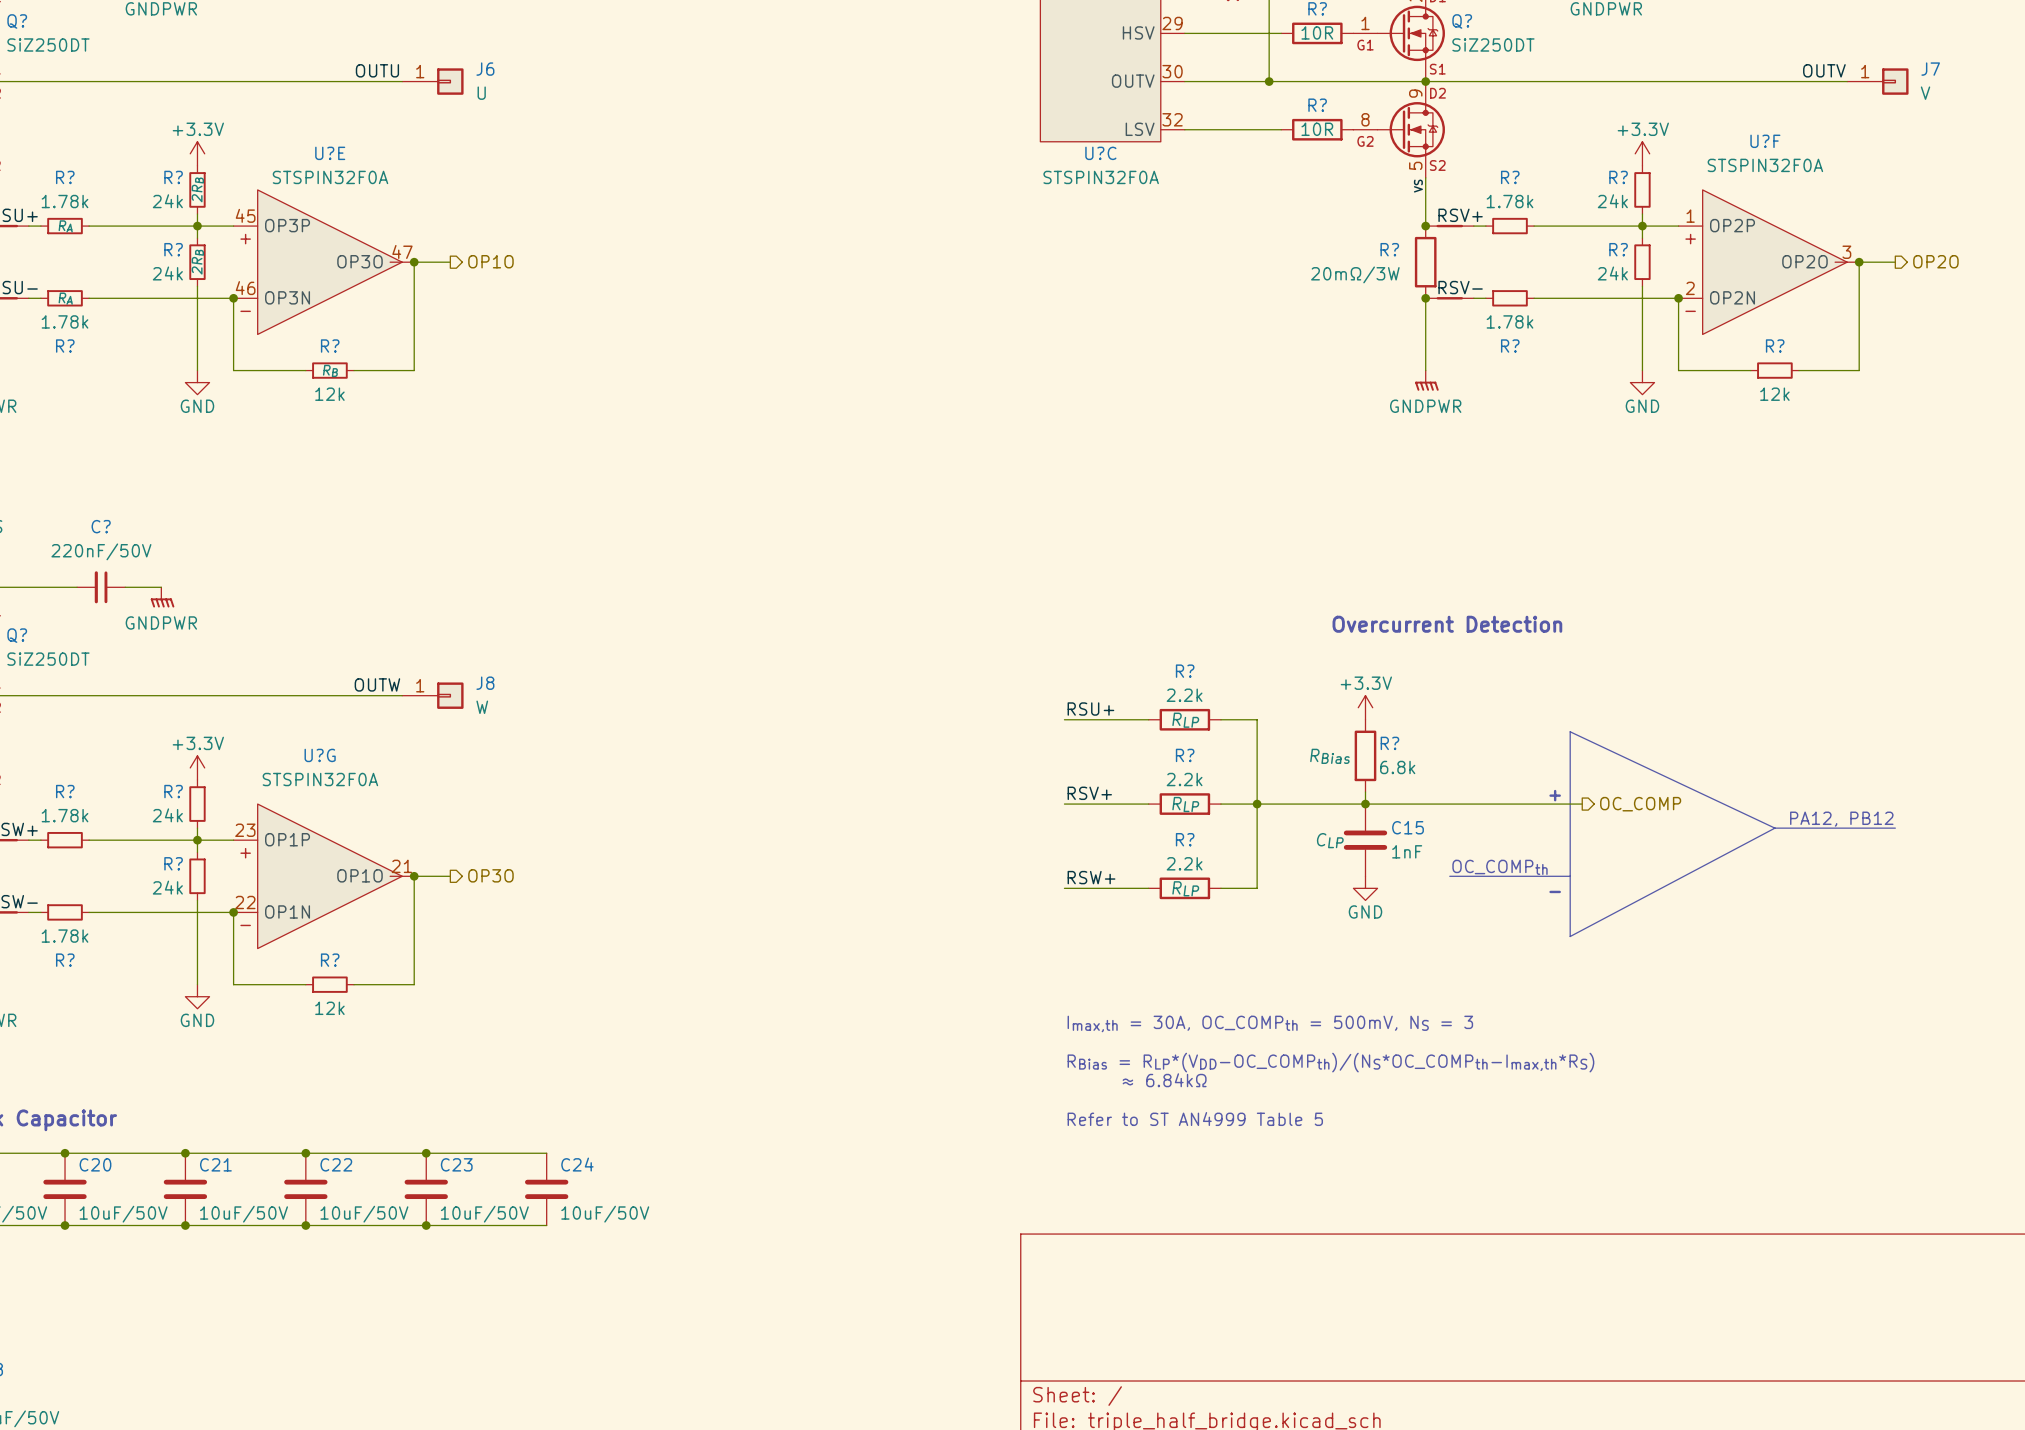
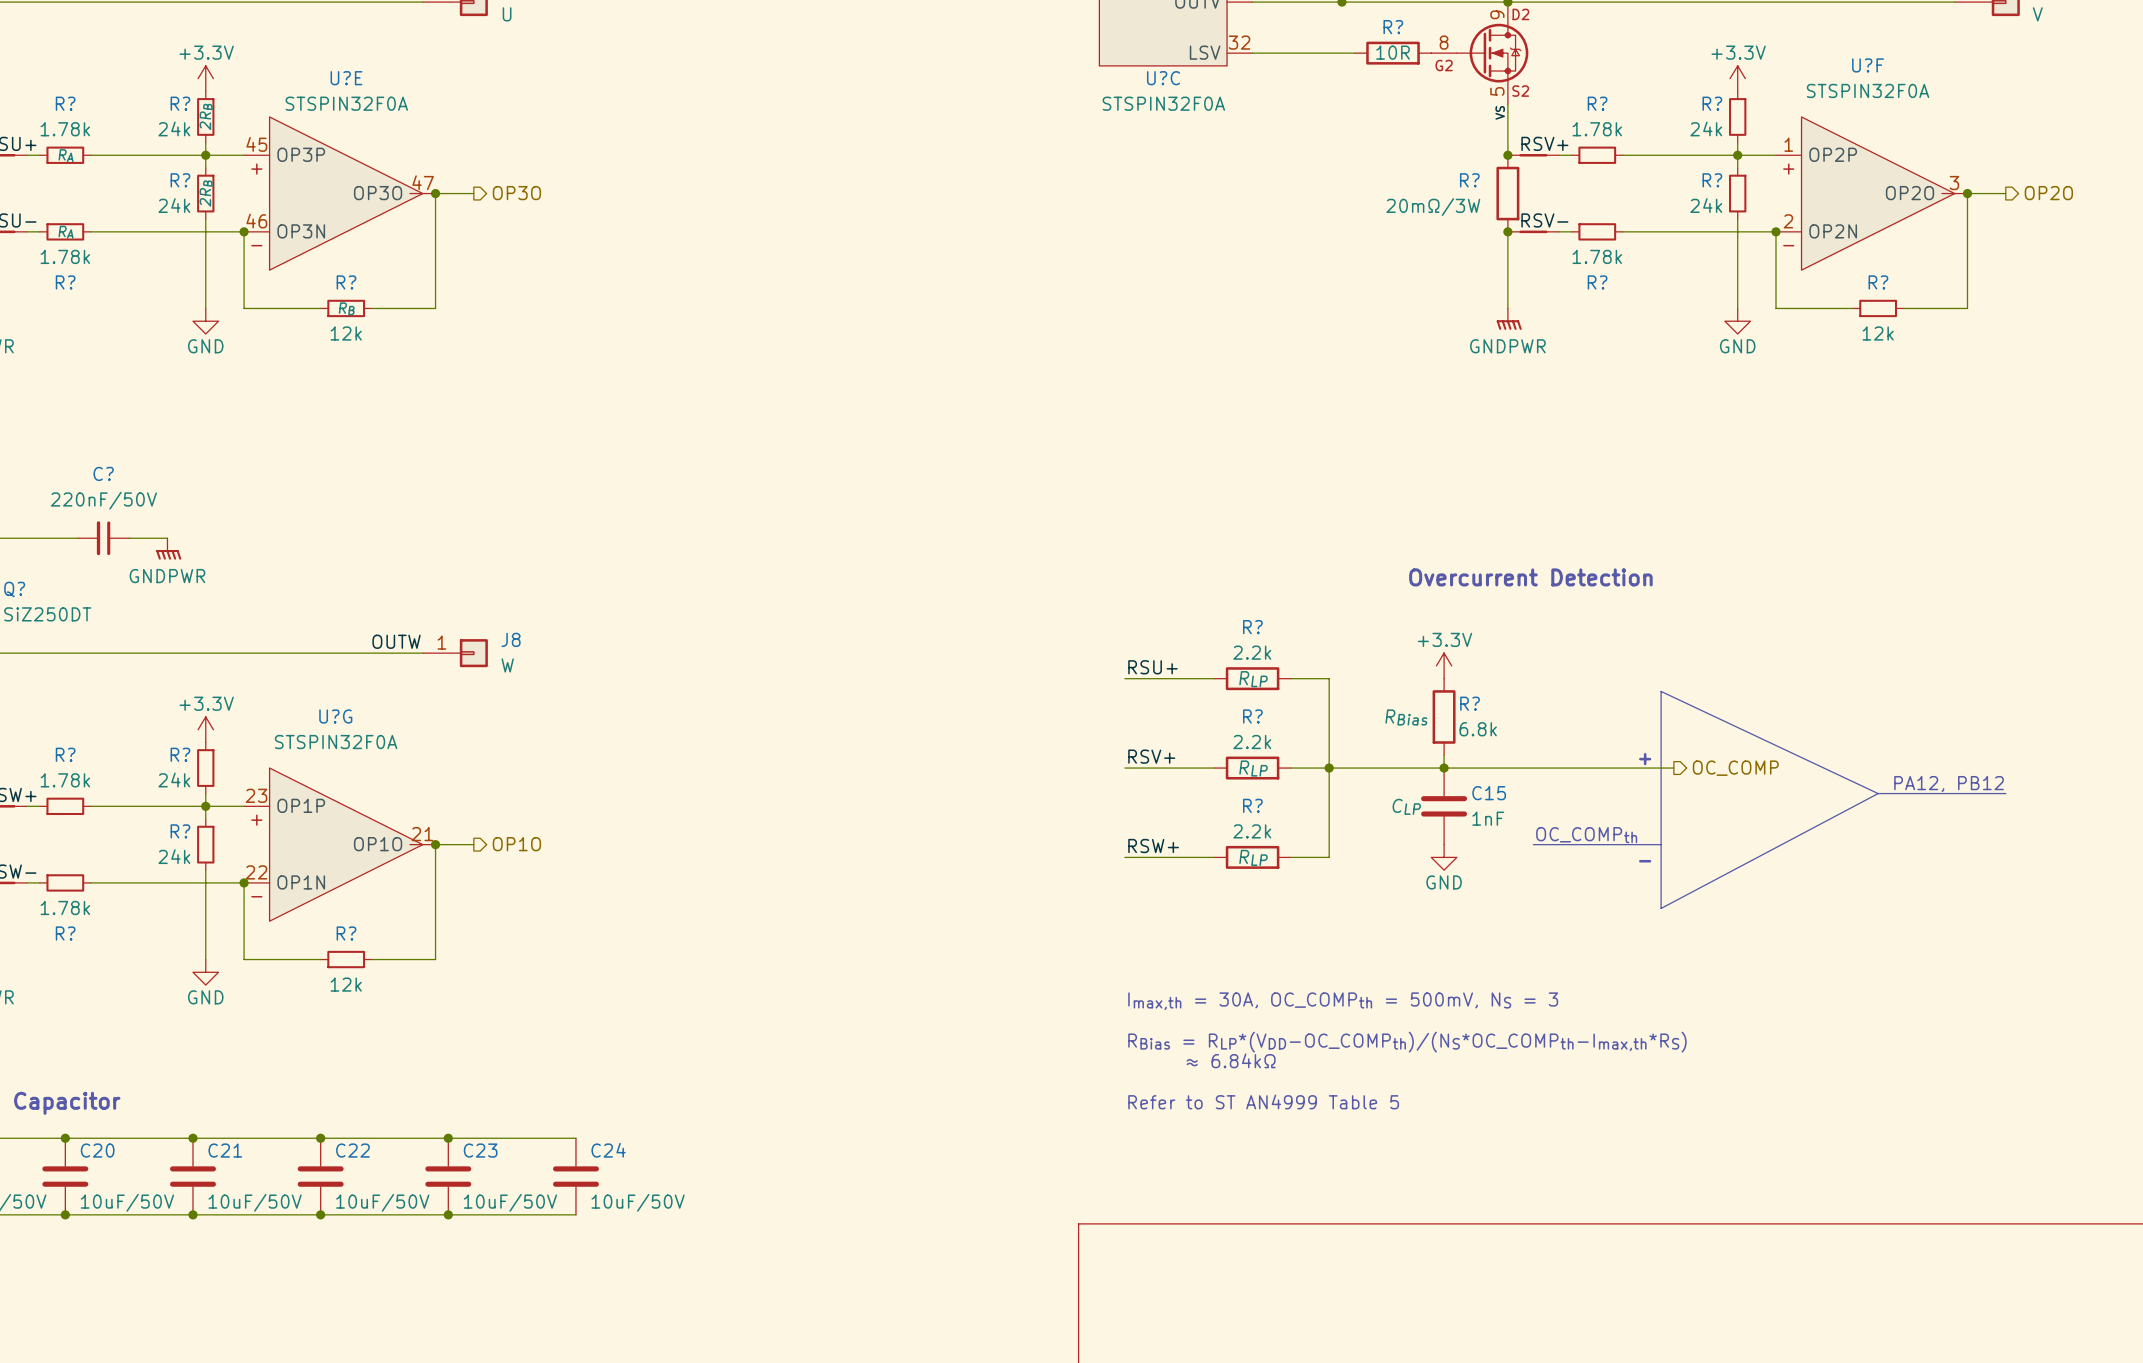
hierarchical label: OP1O (490, 261) -> OP3O (516, 193)
hierarchical label: OP3O (490, 875) -> OP1O (516, 844)

